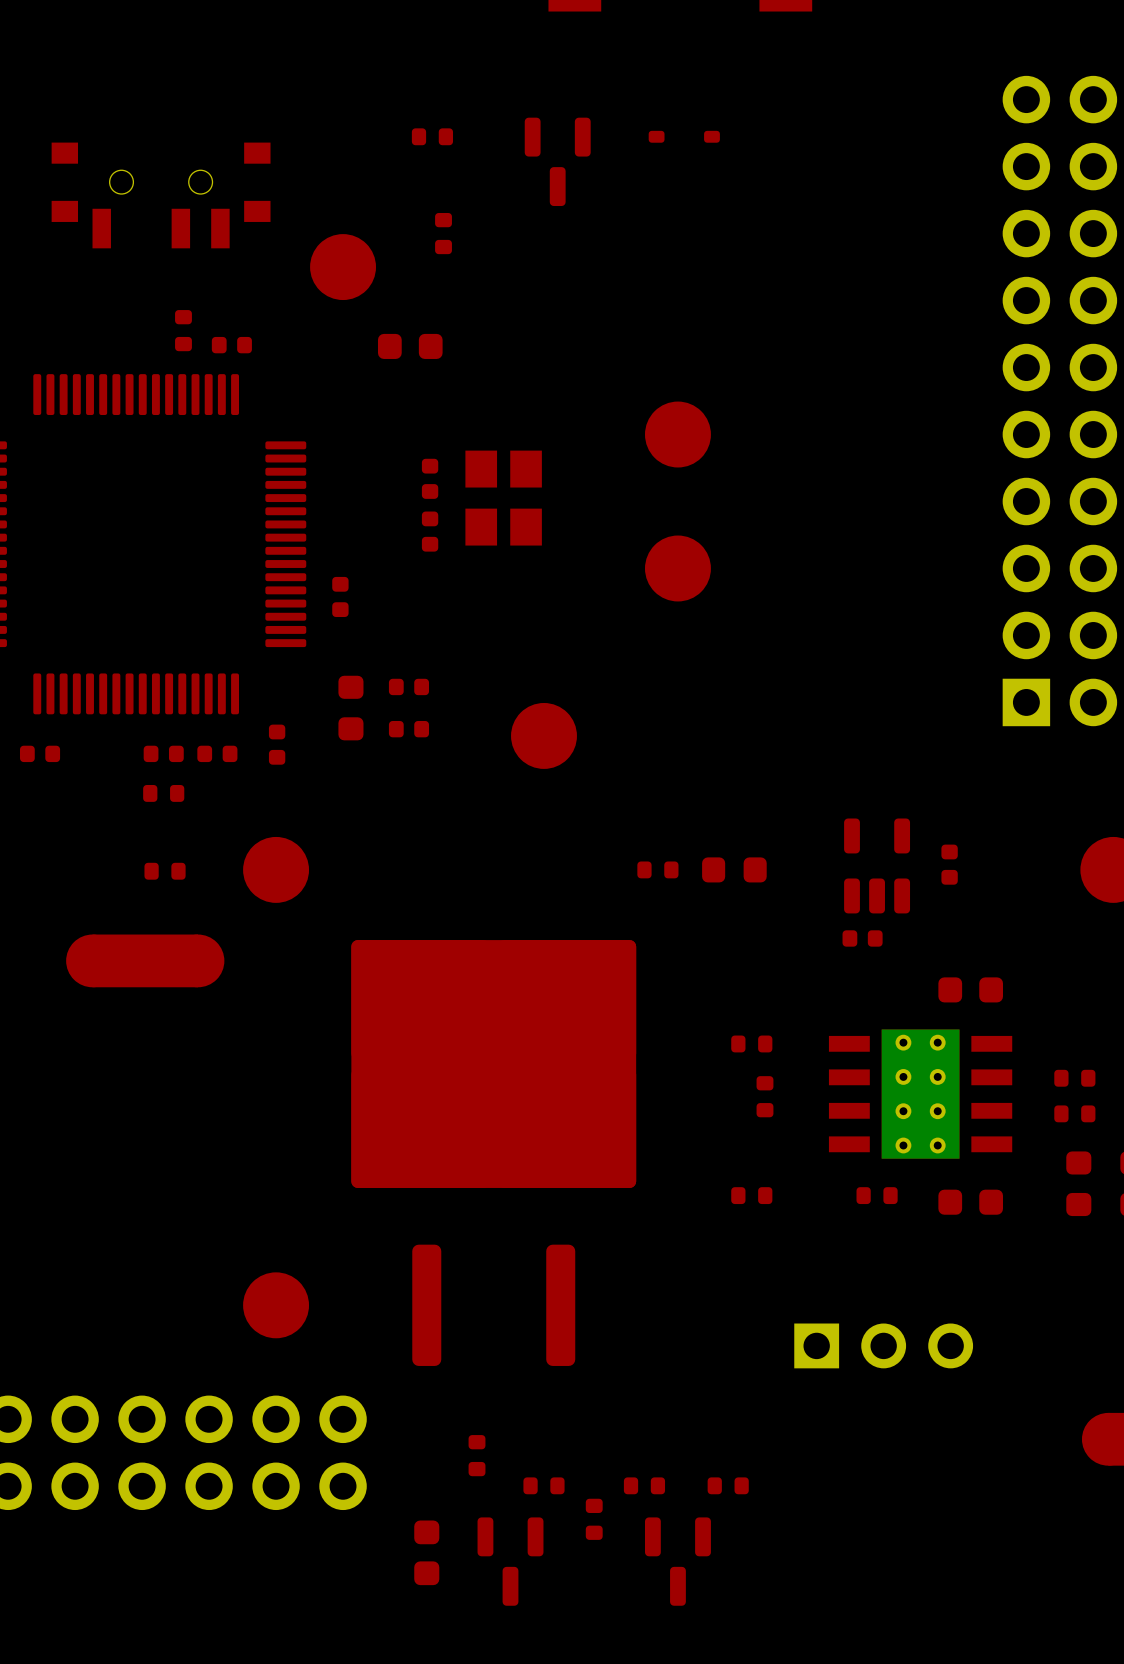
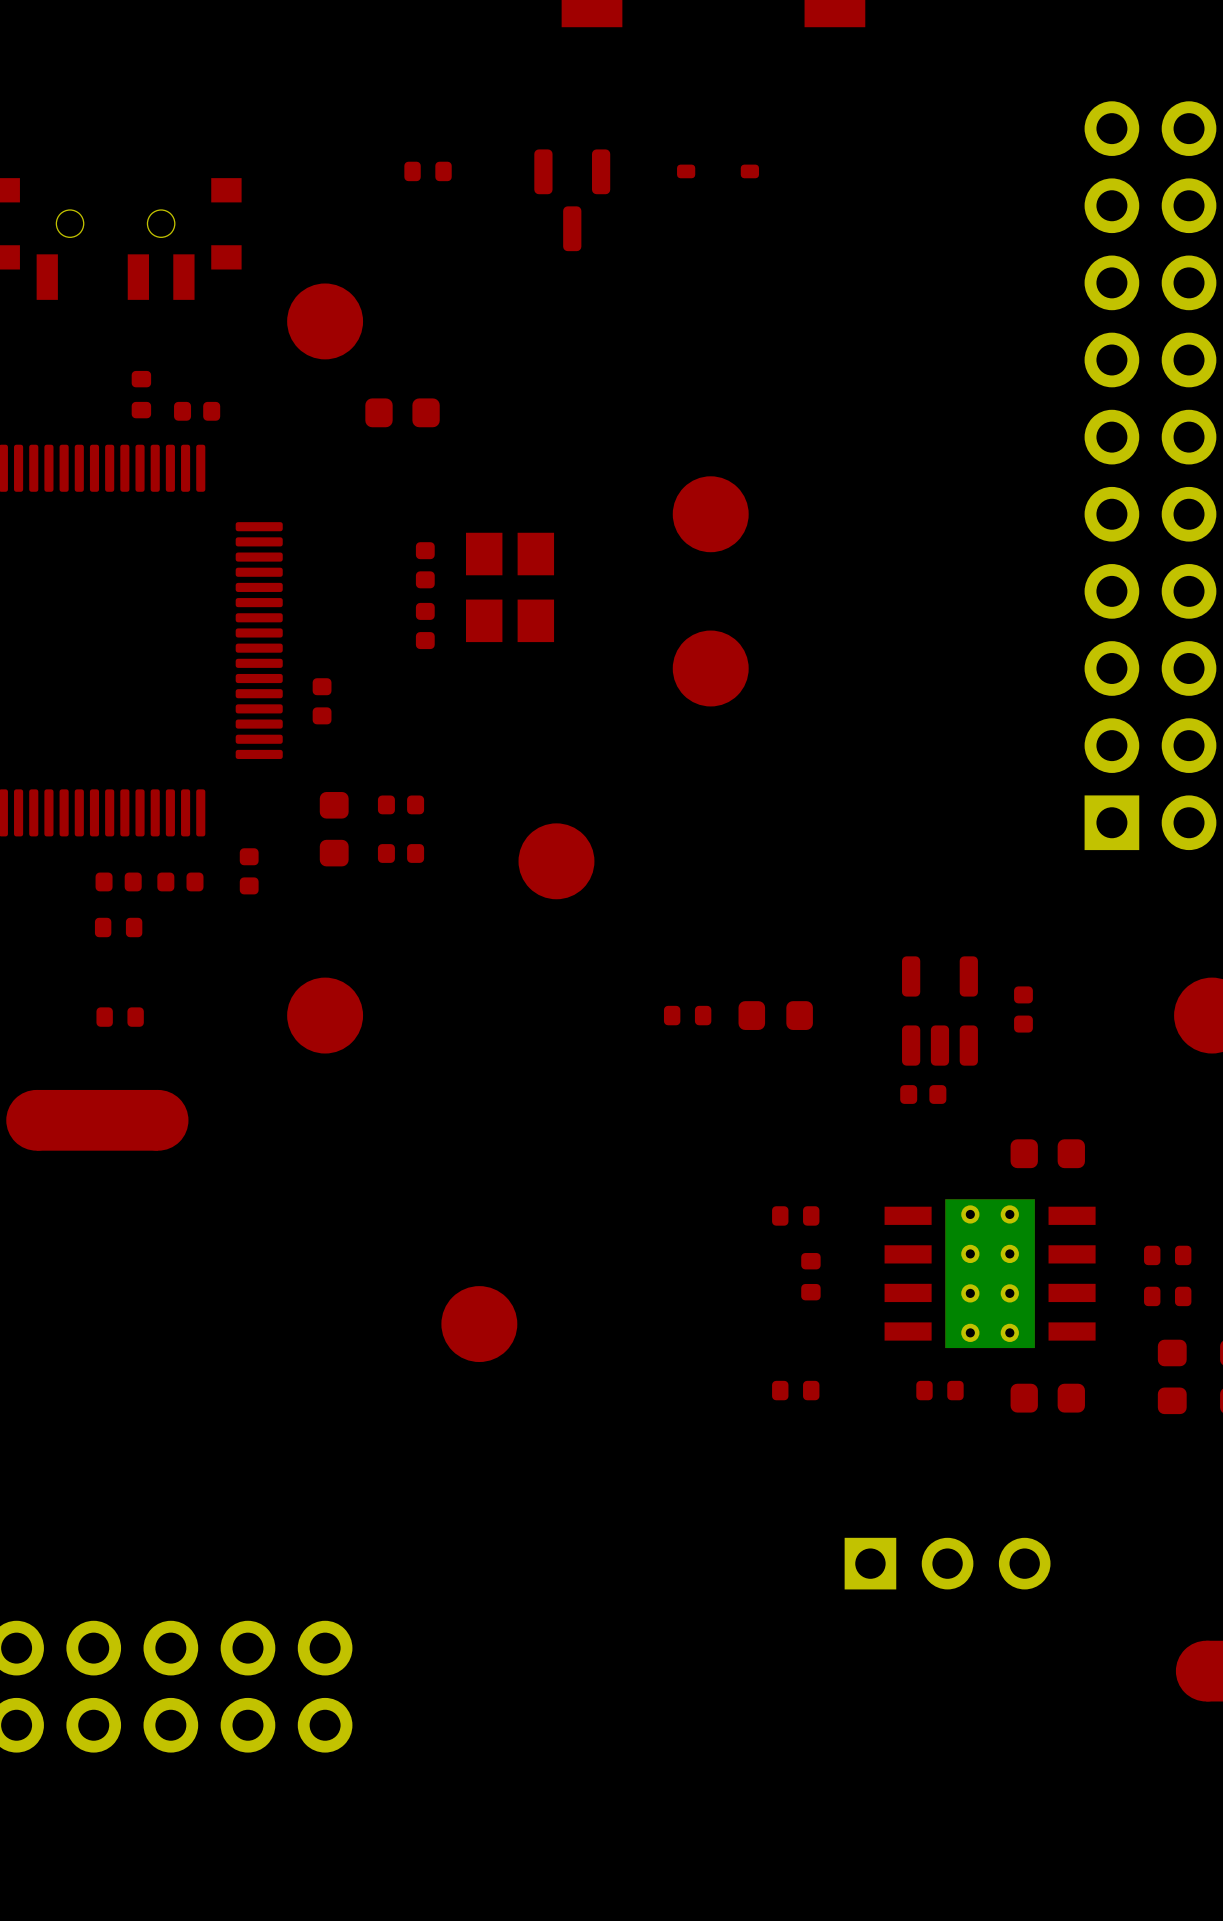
part: (443, 233) -> none
part position: (276, 869) -> (325, 1015)
part footprint: [351, 940, 637, 1366] -> [441, 1286, 518, 1363]
part: (276, 1305) -> none
part: (477, 1455) -> none
part: (543, 1485) -> none
part: (644, 1485) -> none
part: (728, 1485) -> none
part: (594, 1519) -> none
part: (426, 1552) -> none
part: (510, 1561) -> none
part: (677, 1561) -> none

